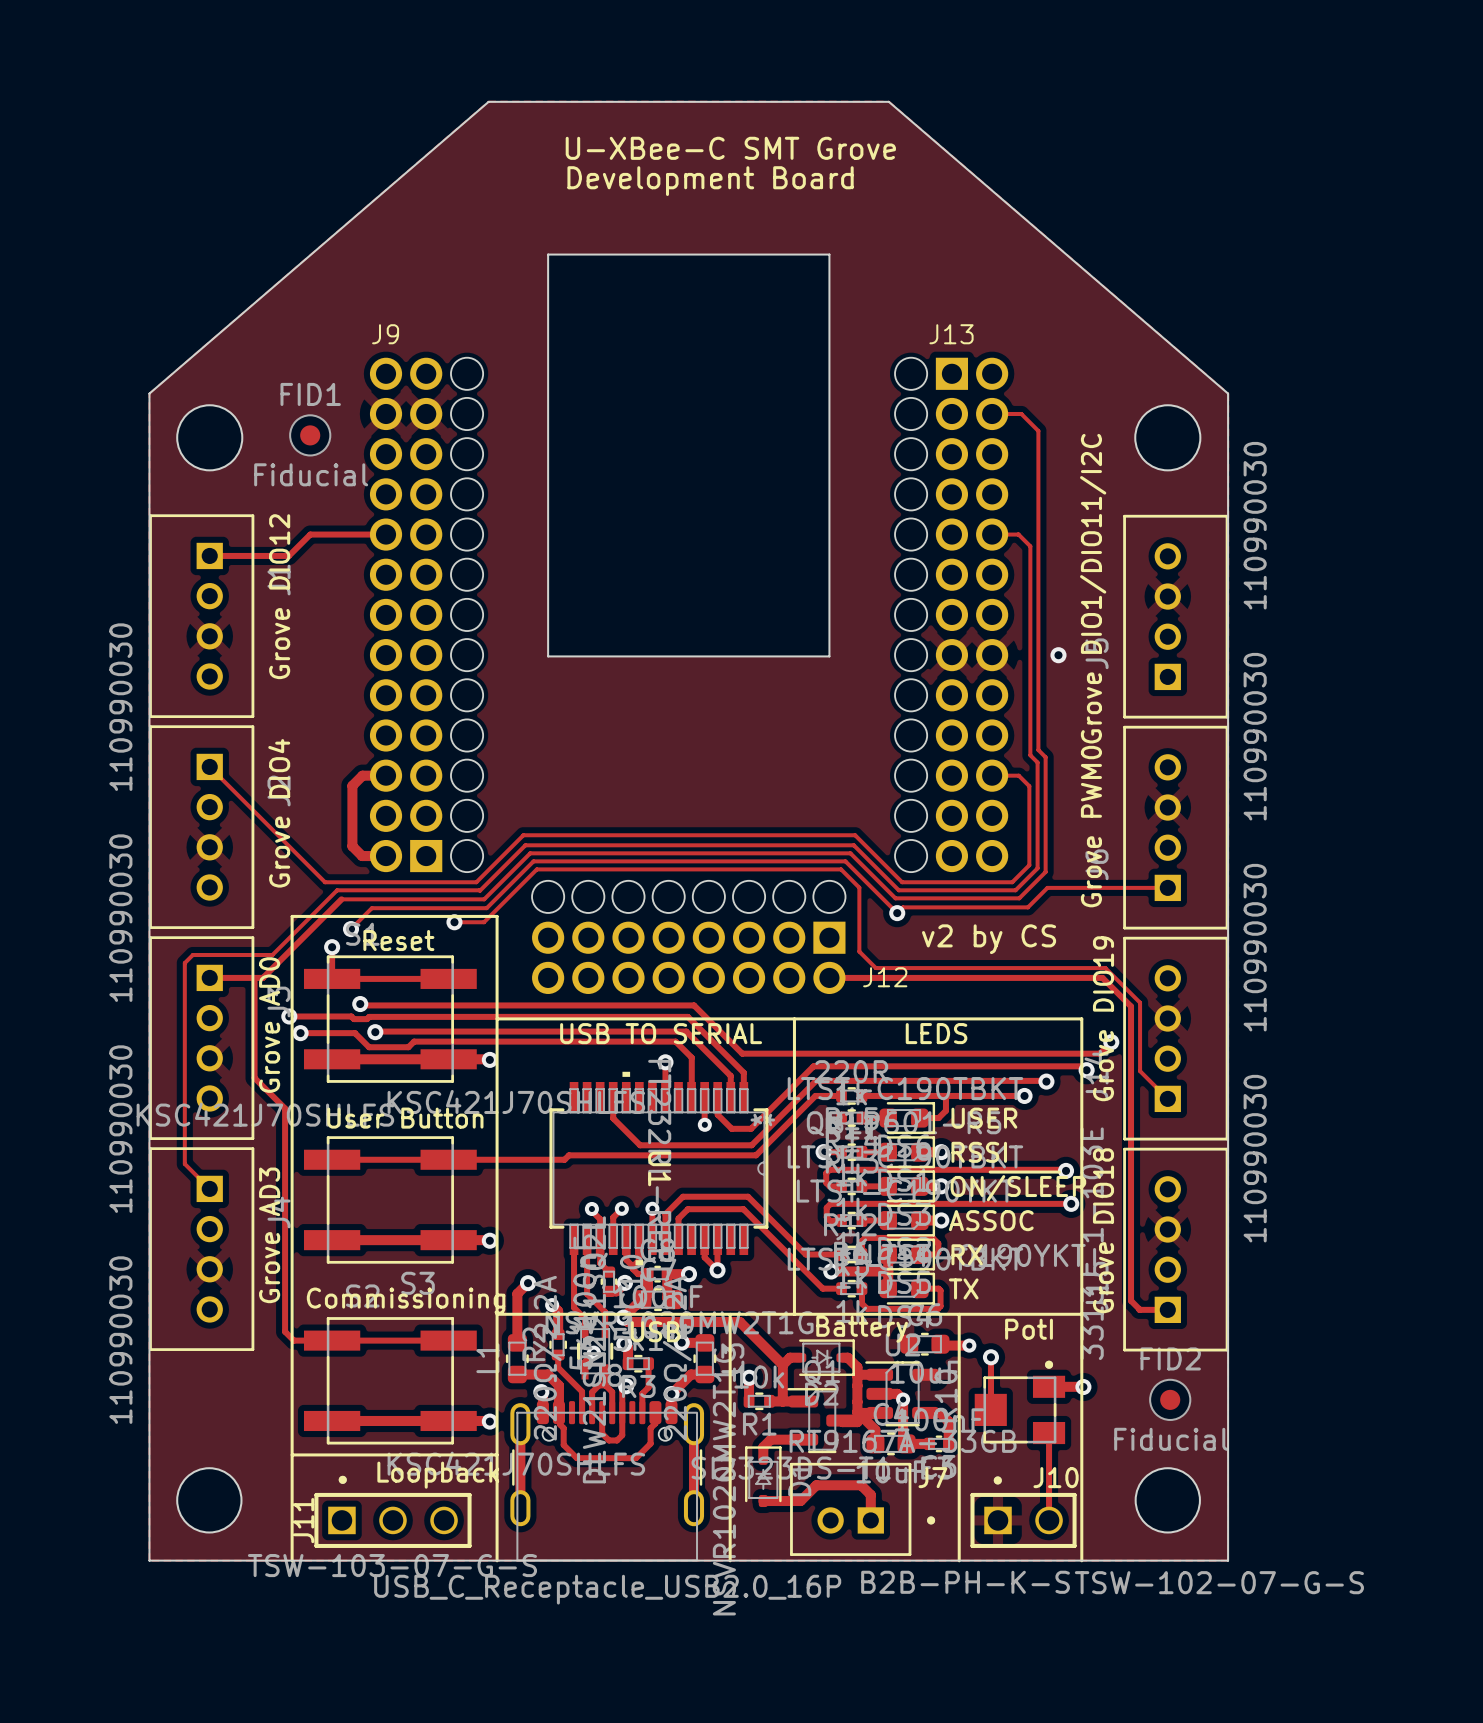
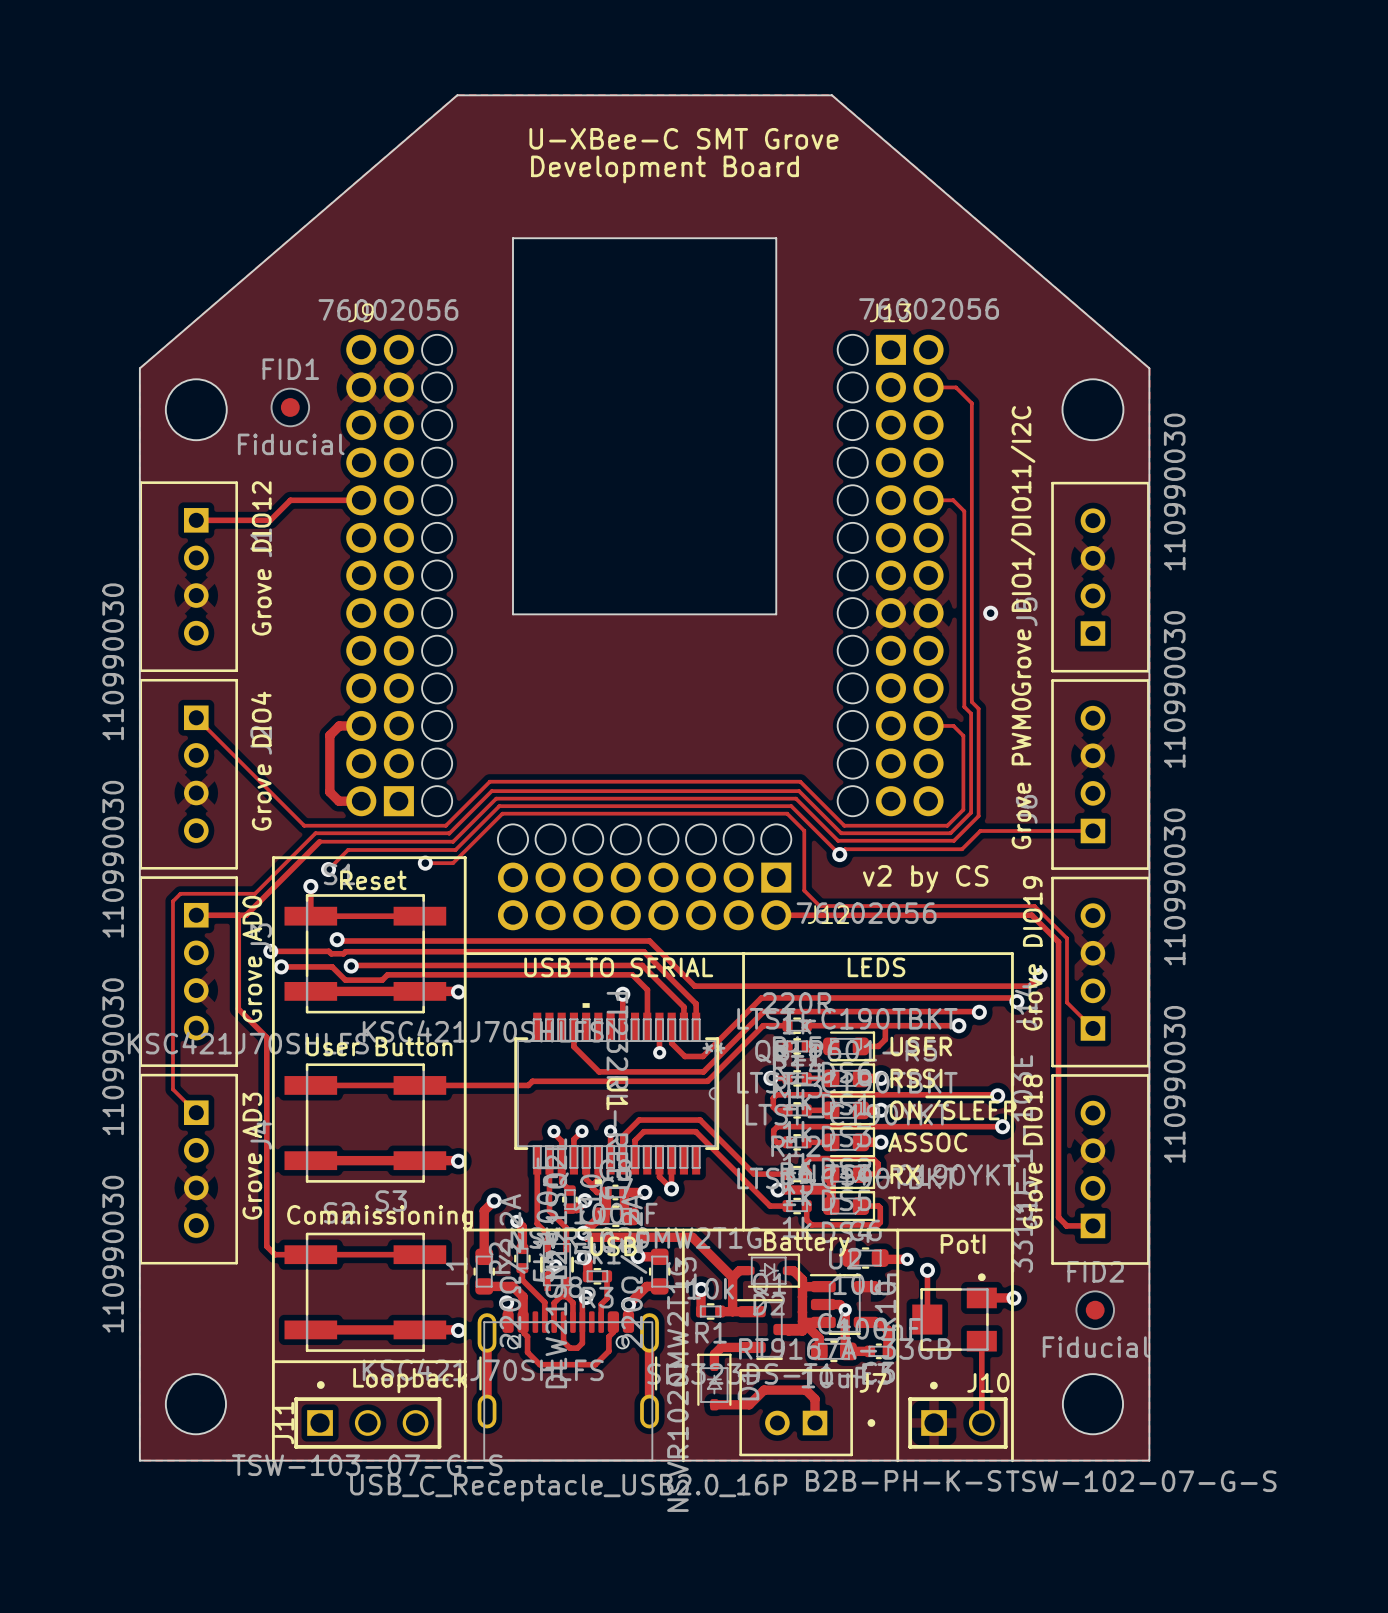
J13 value: none -> 76002056 (929, 308)
J9 value: none -> 76002056 (388, 309)
J12 value: none -> 76002056 (866, 913)

